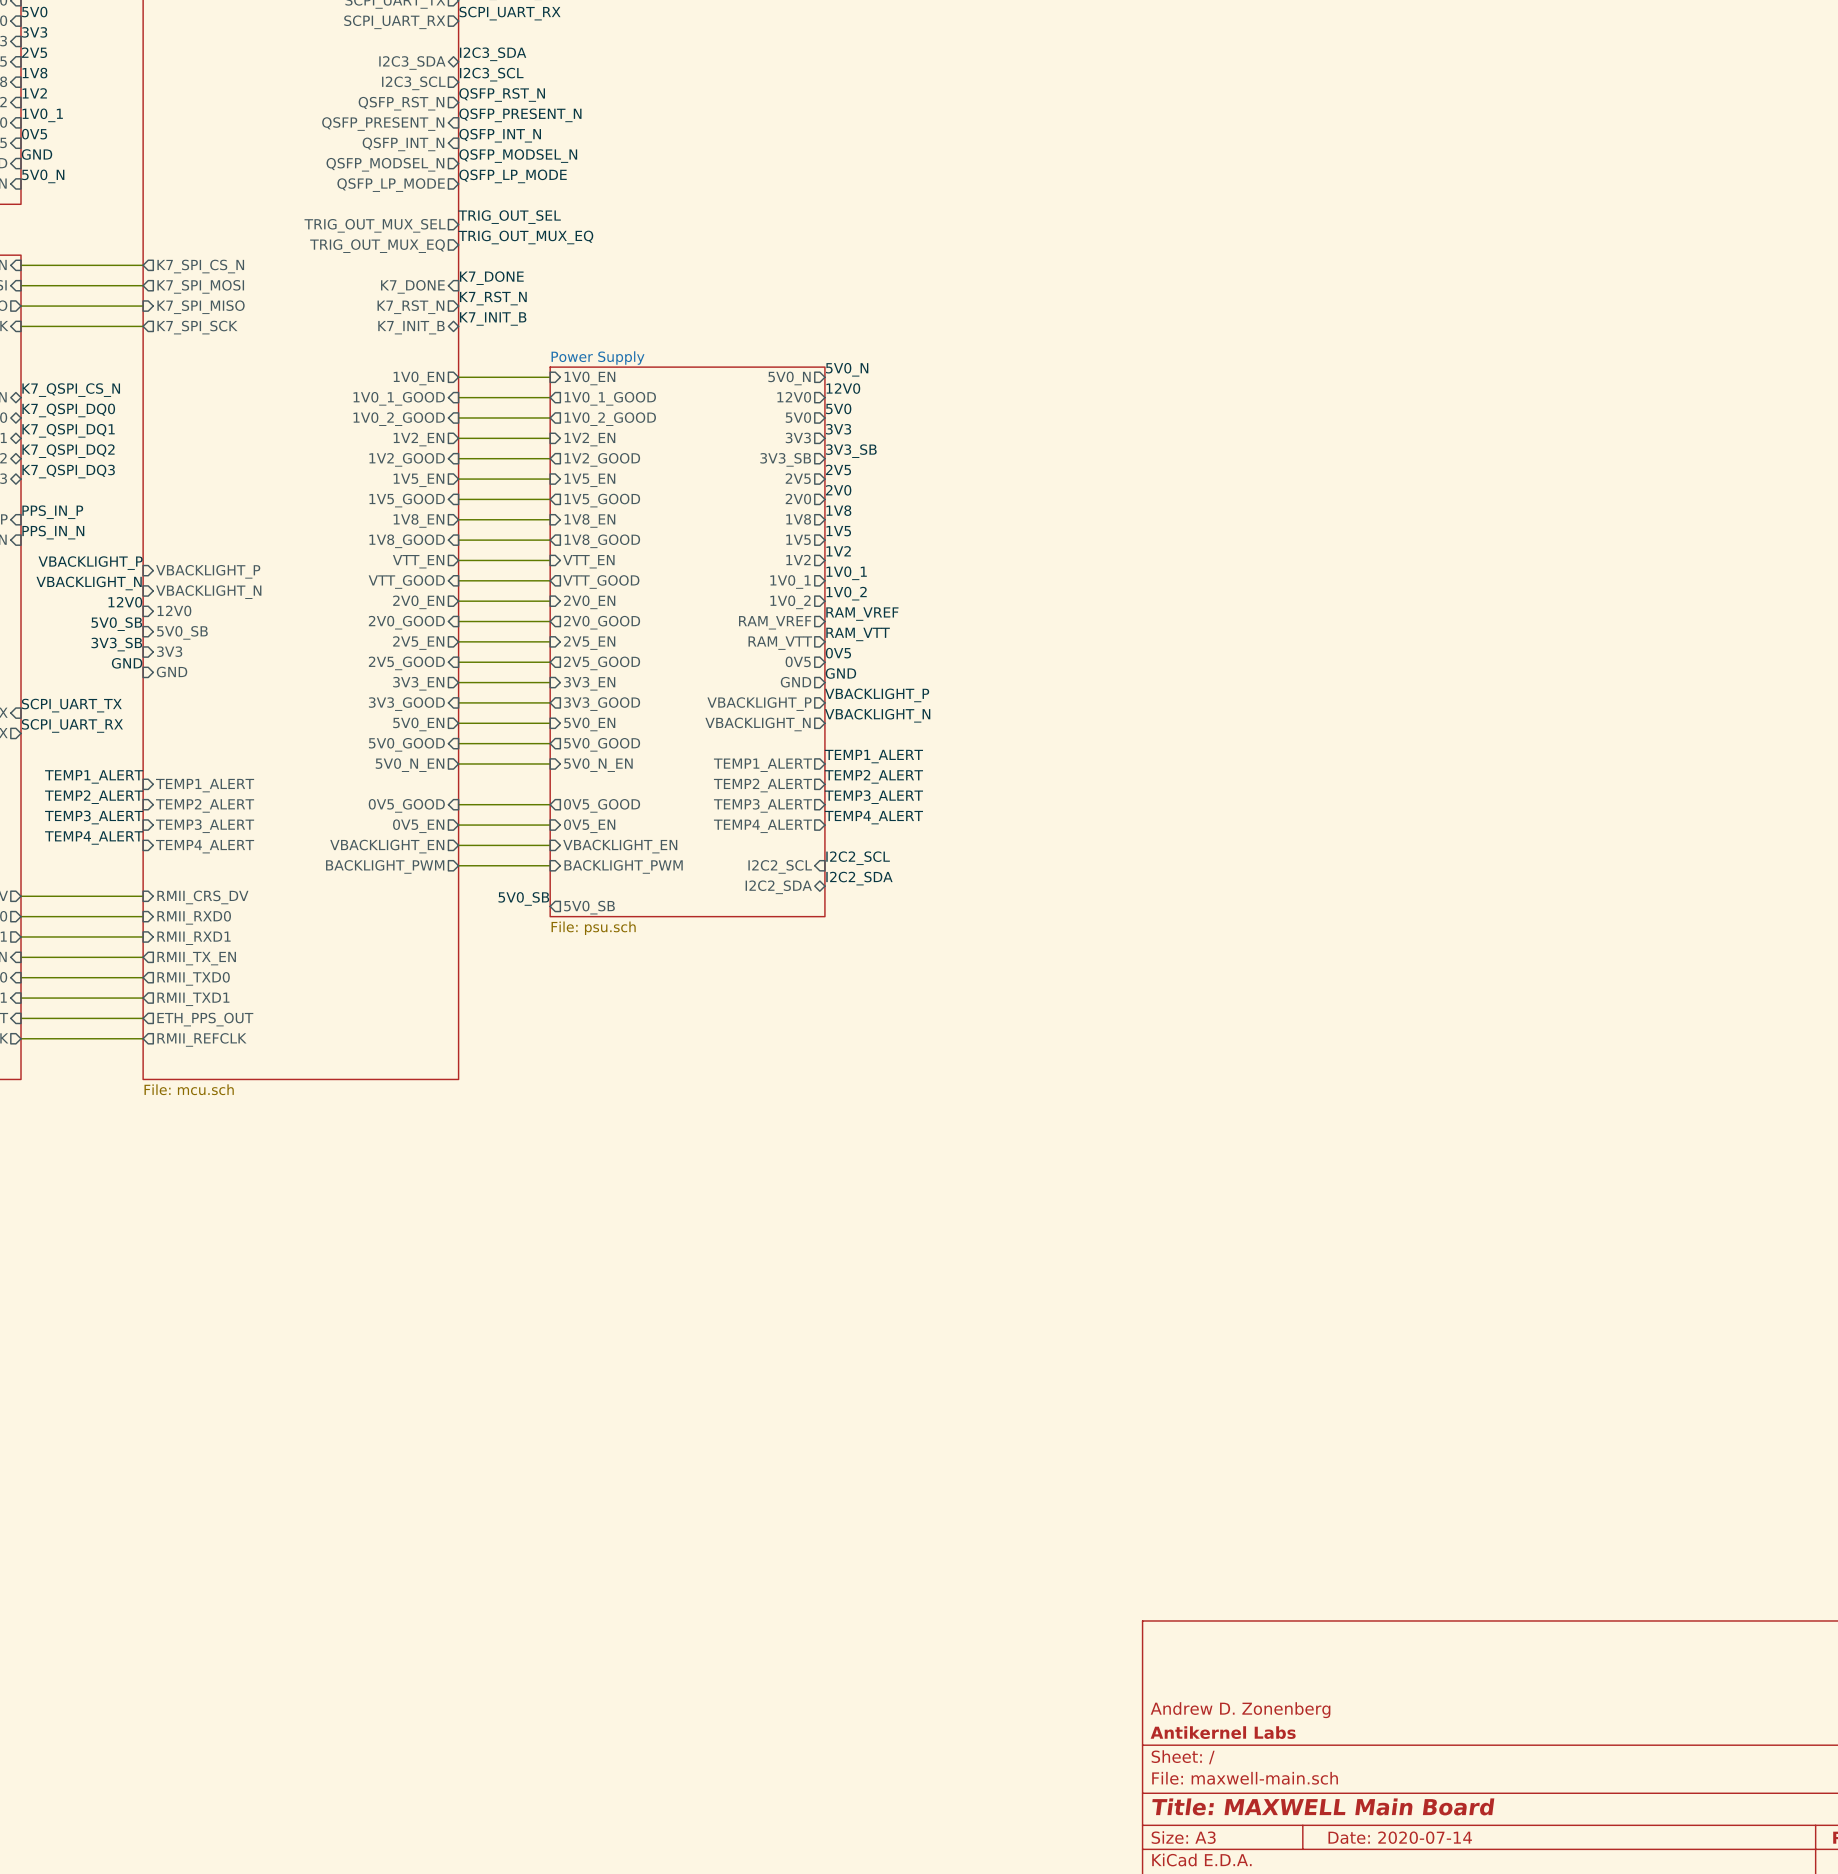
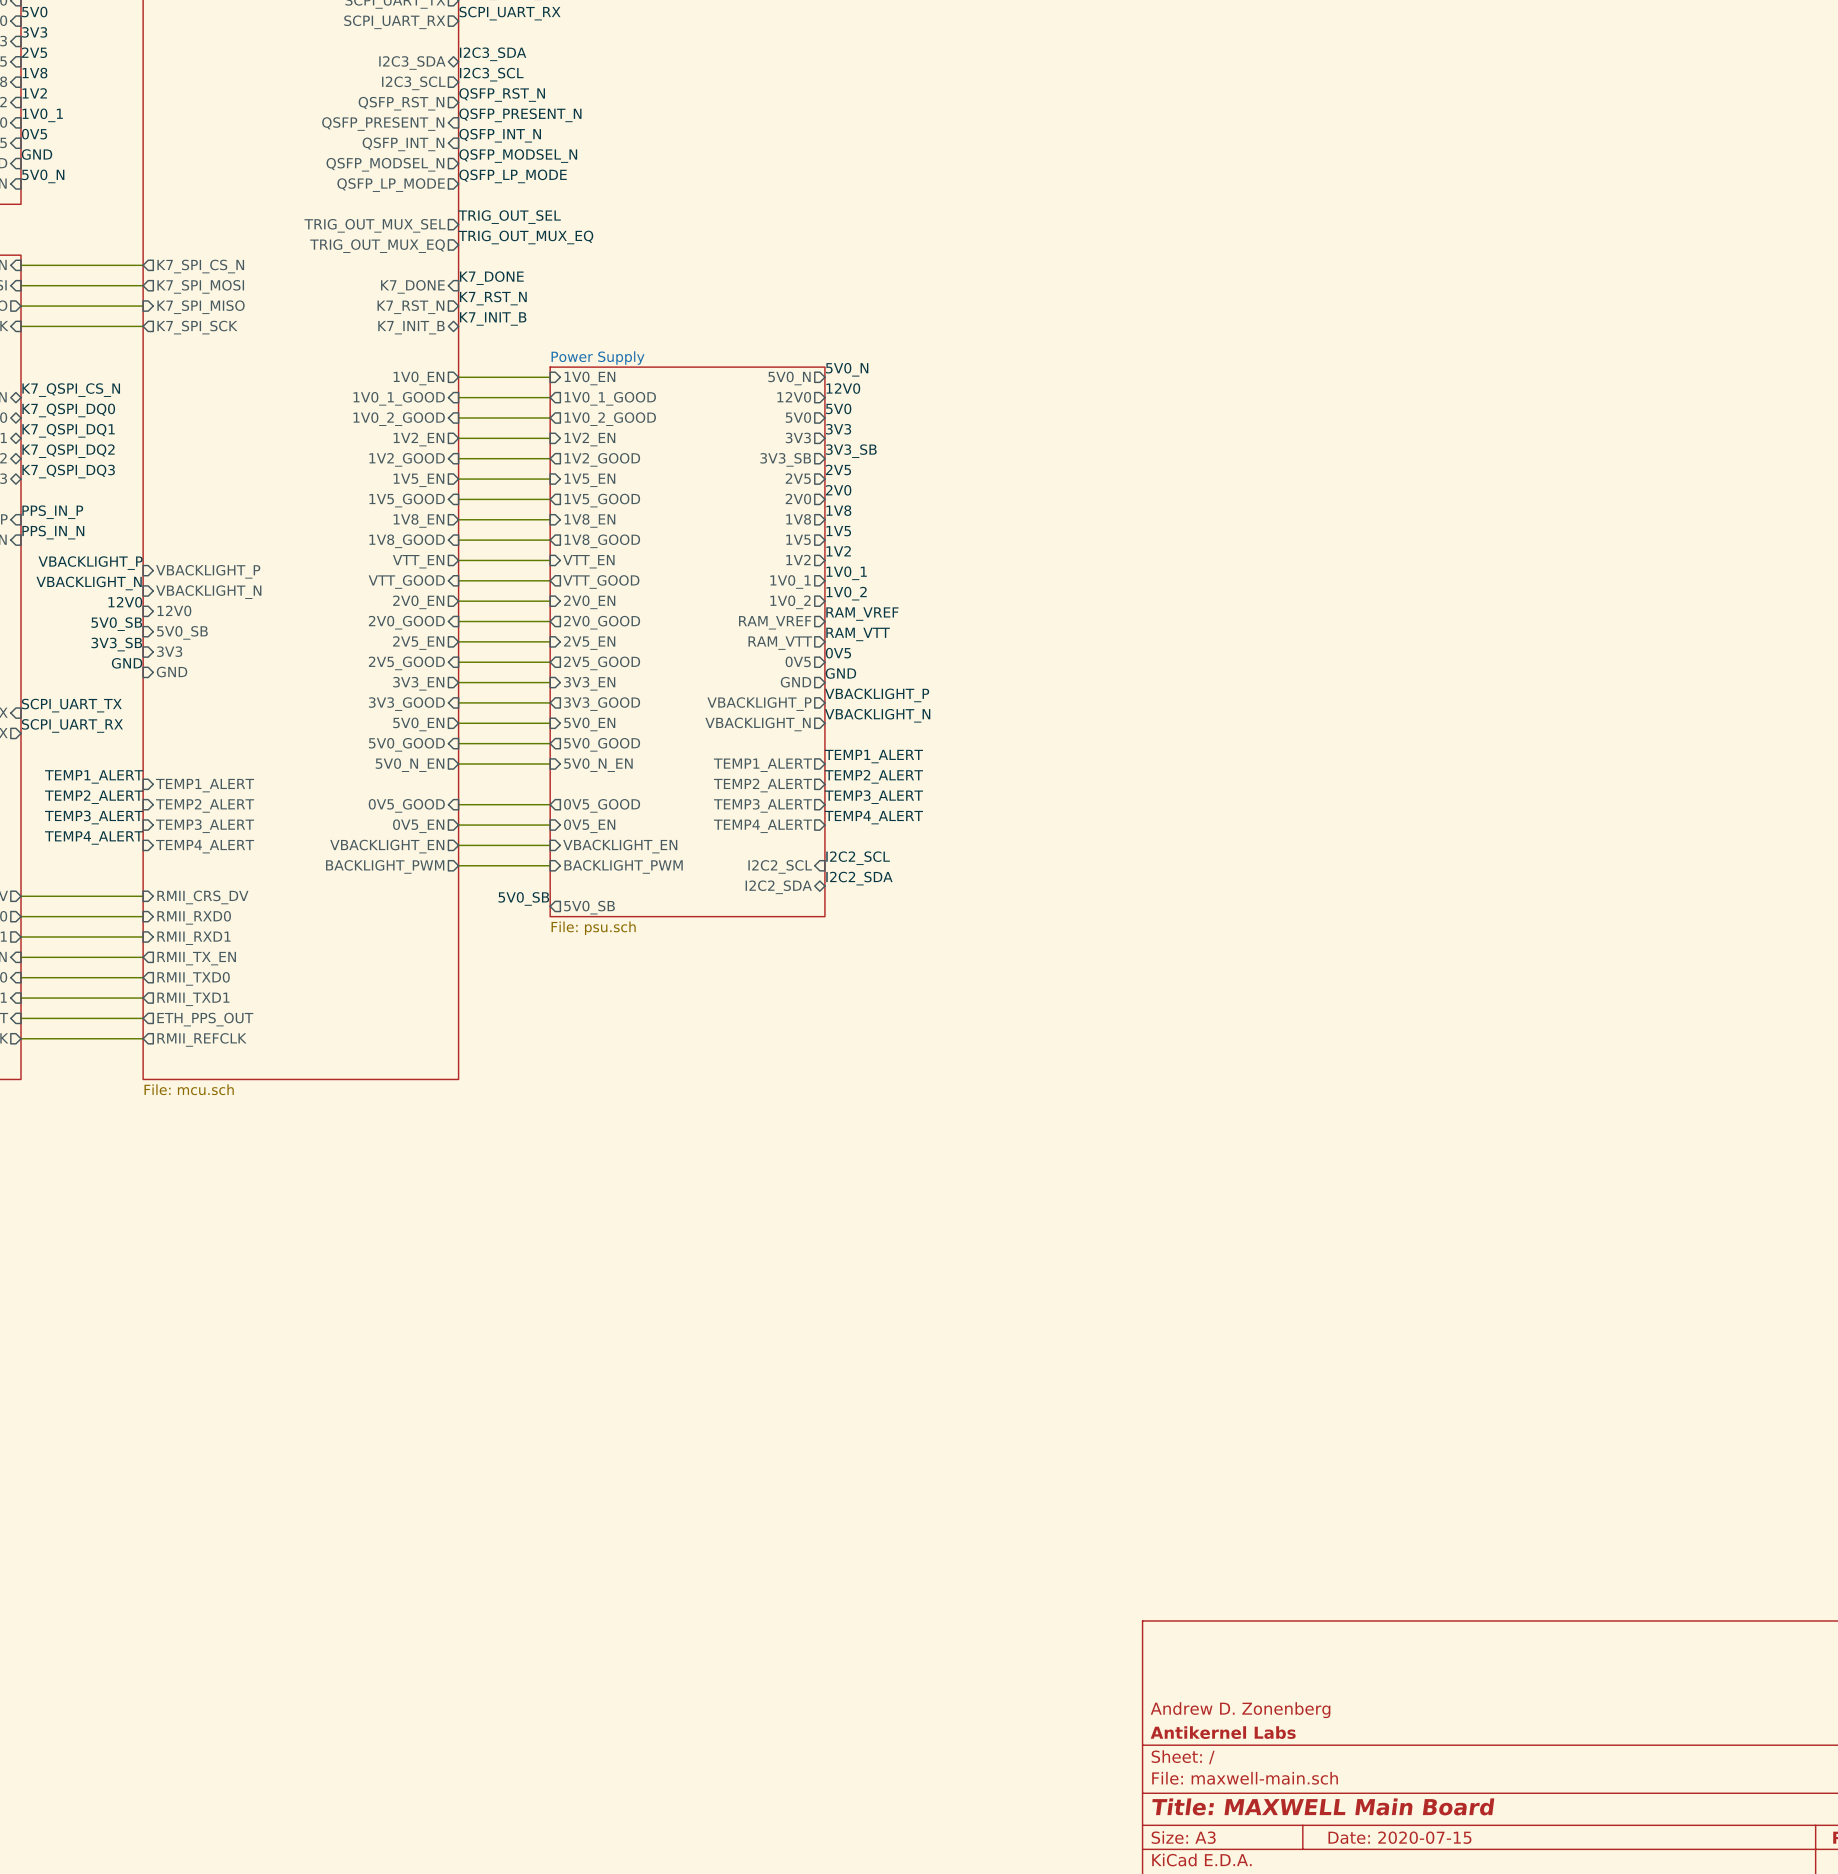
title block: Date: 2020-07-14 (1400, 1837) -> Date: 2020-07-15 (1399, 1837)

